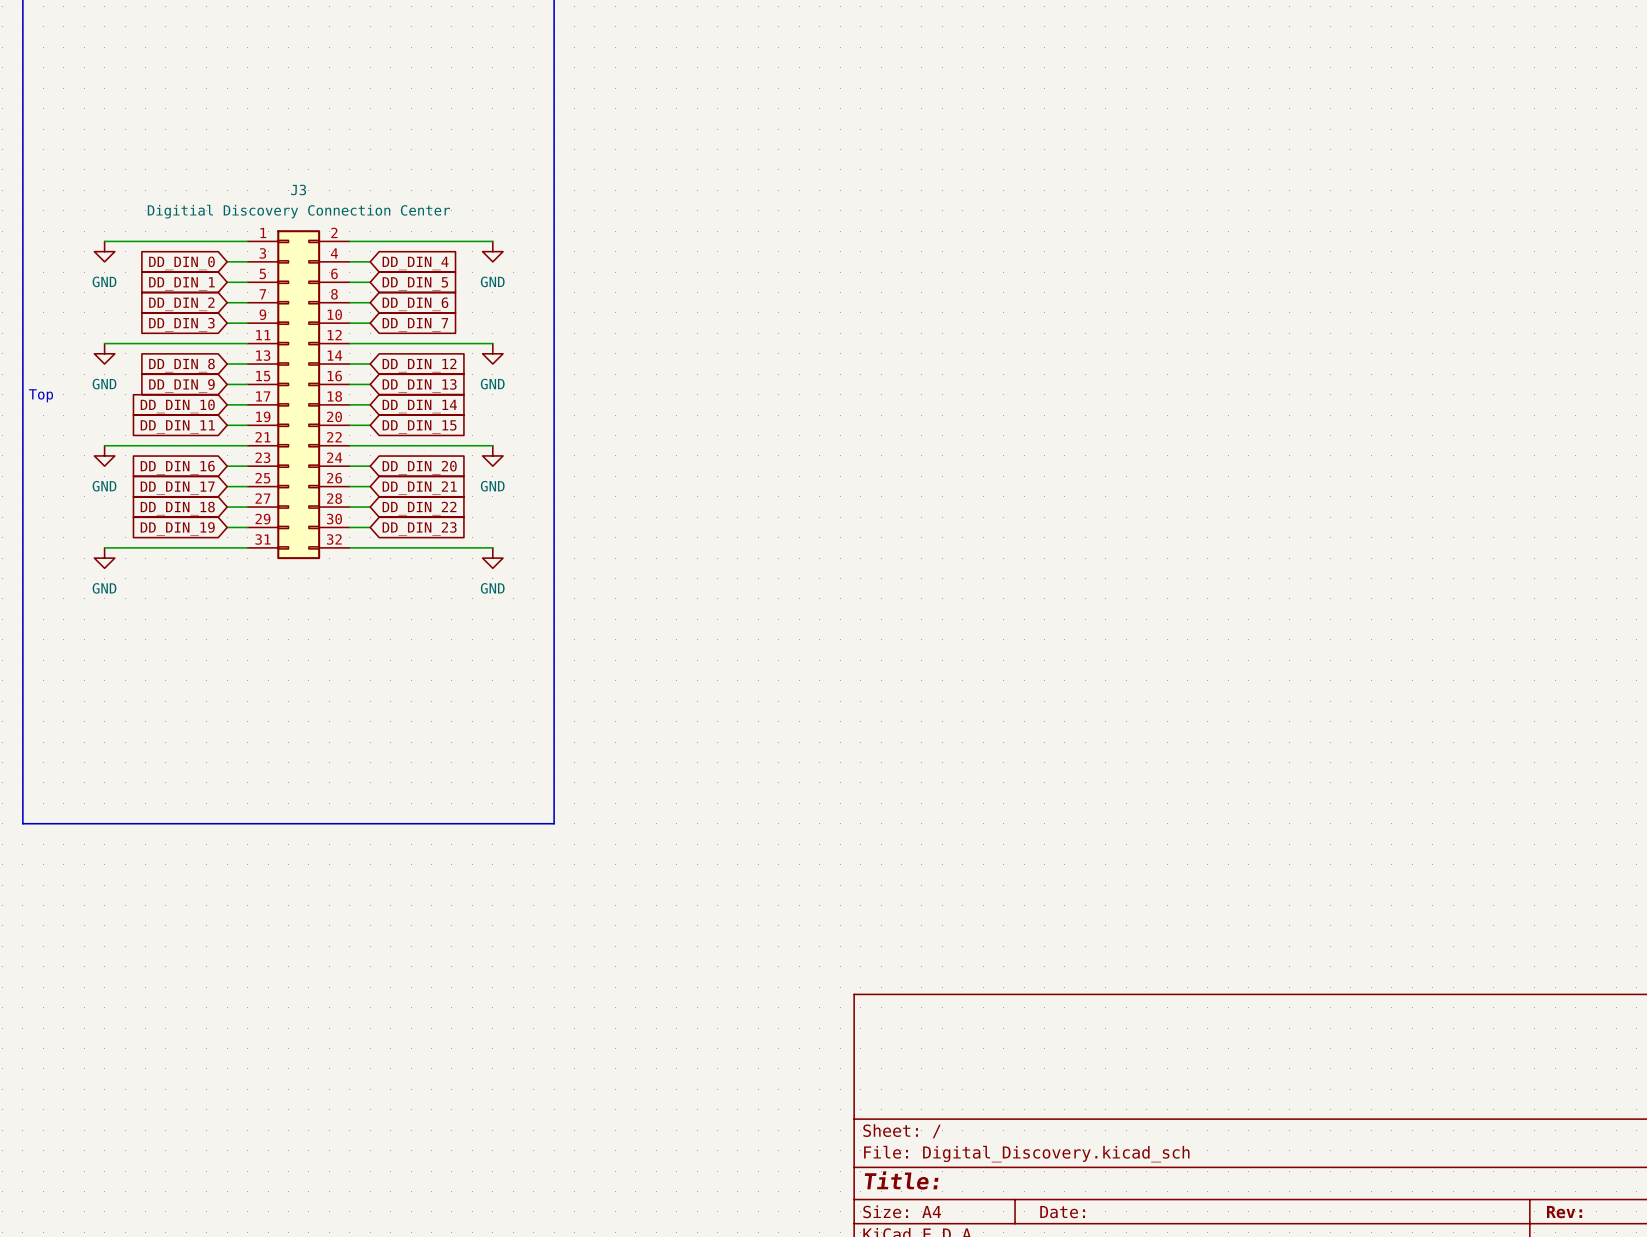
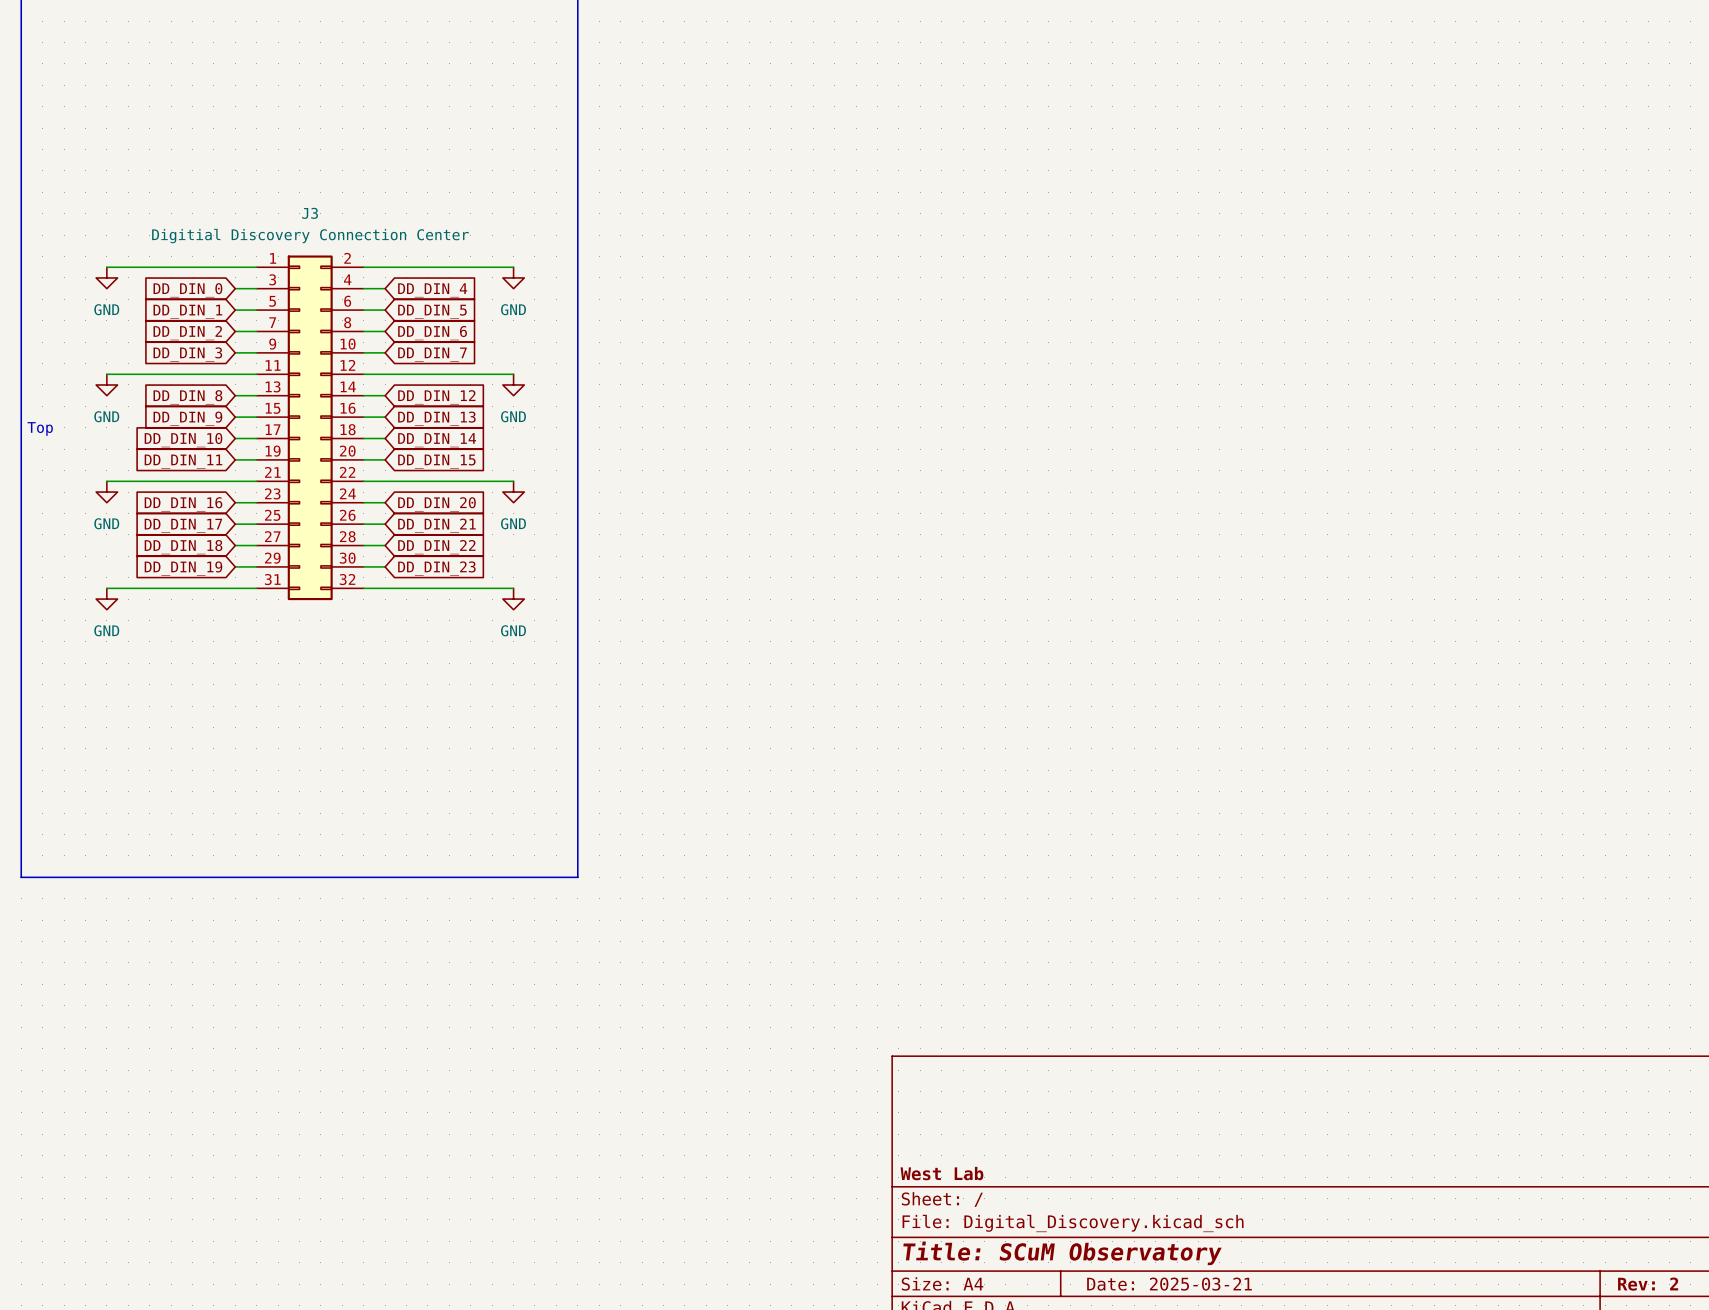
title block: none -> West Lab (941, 1173)
title block: Title: (901, 1180) -> Title: SCuM Observatory (1062, 1253)
title block: Date: (1062, 1212) -> Date: 2025-03-21 (1169, 1284)
title block: Rev: (1564, 1212) -> Rev: 2 (1648, 1284)

